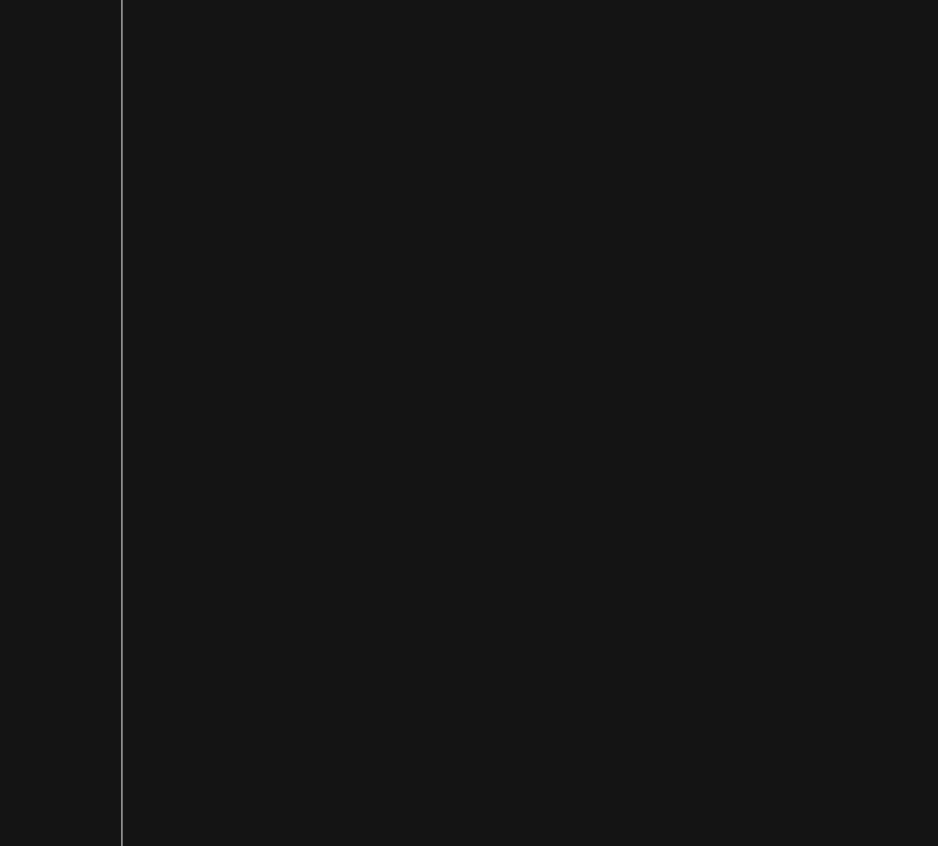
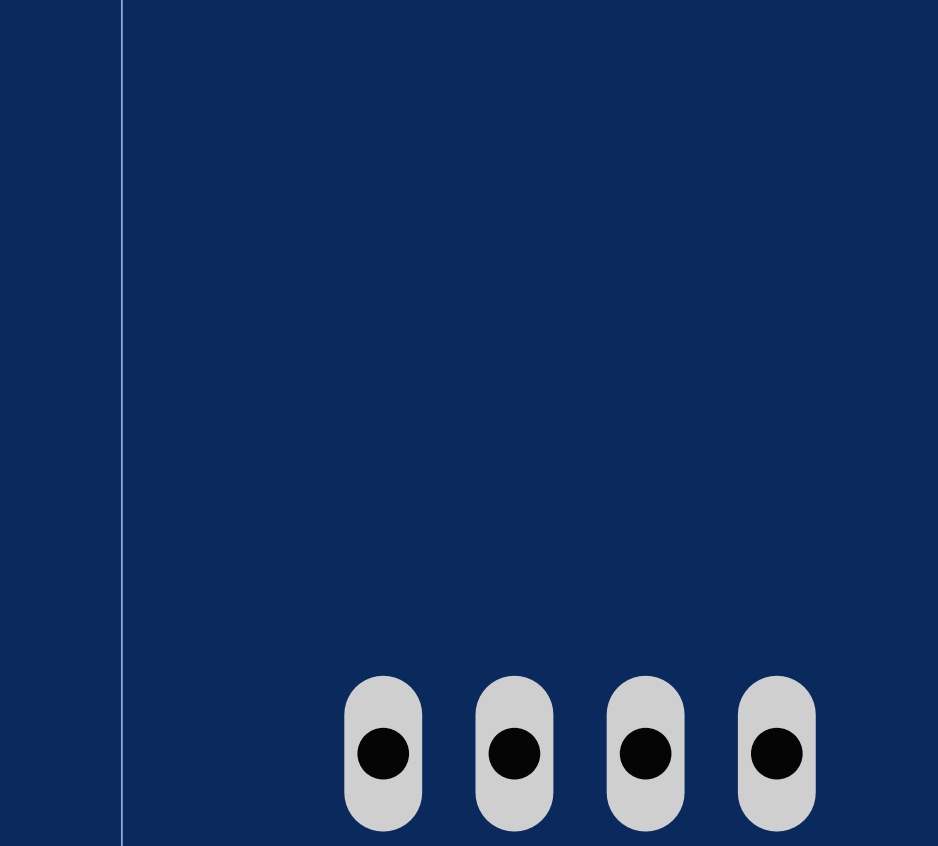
part: none -> (580, 753)

